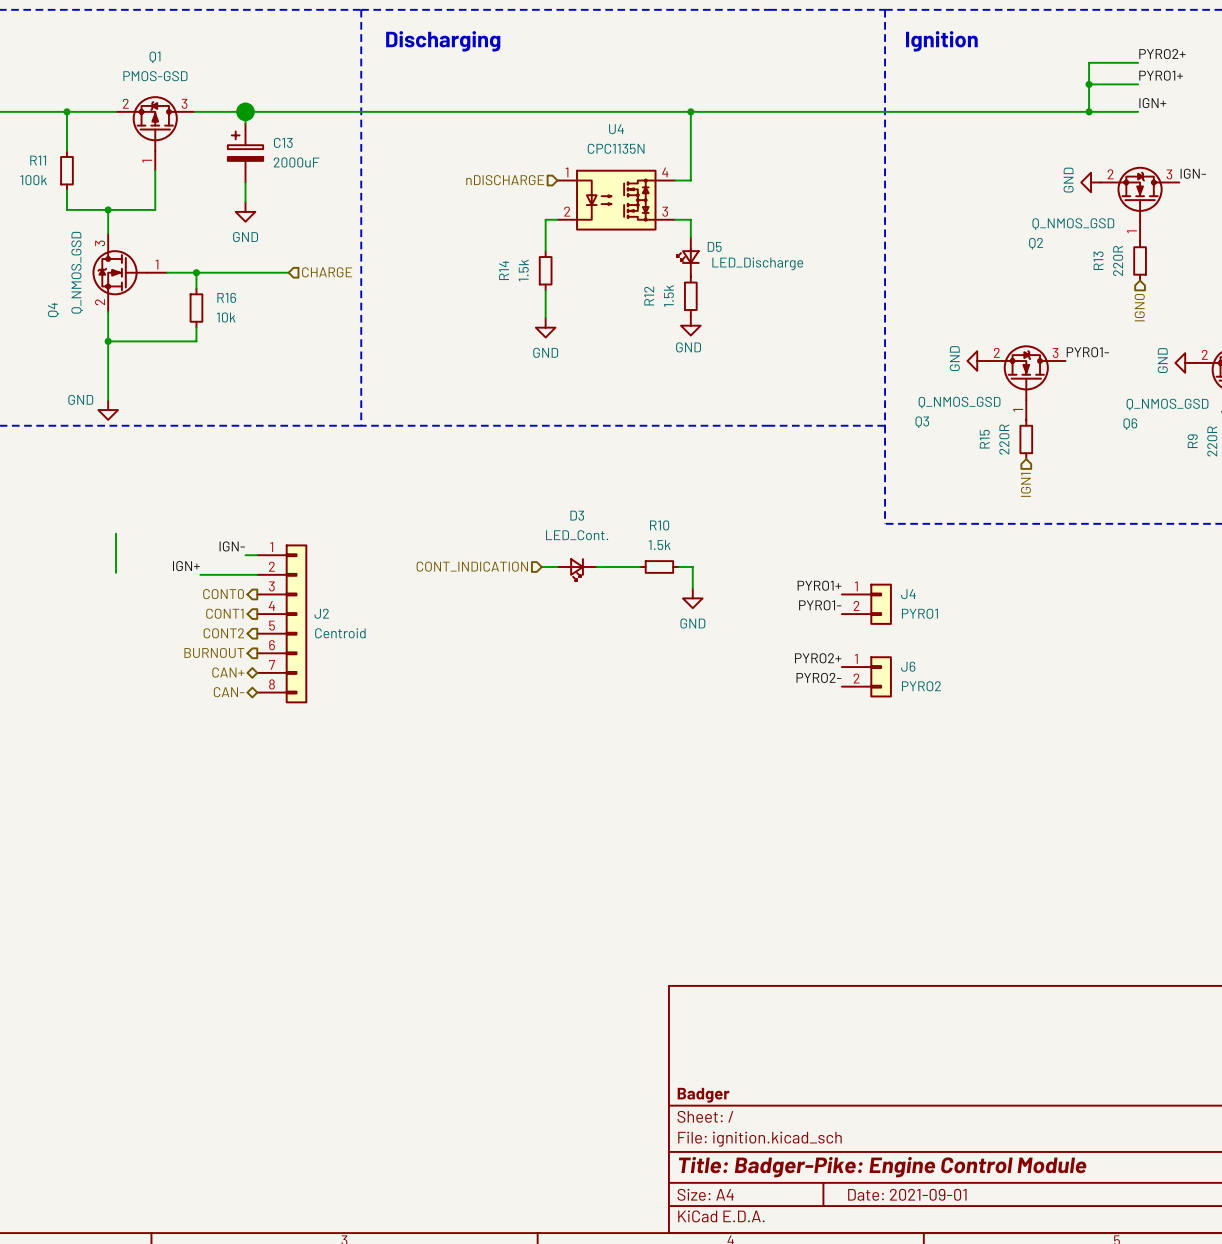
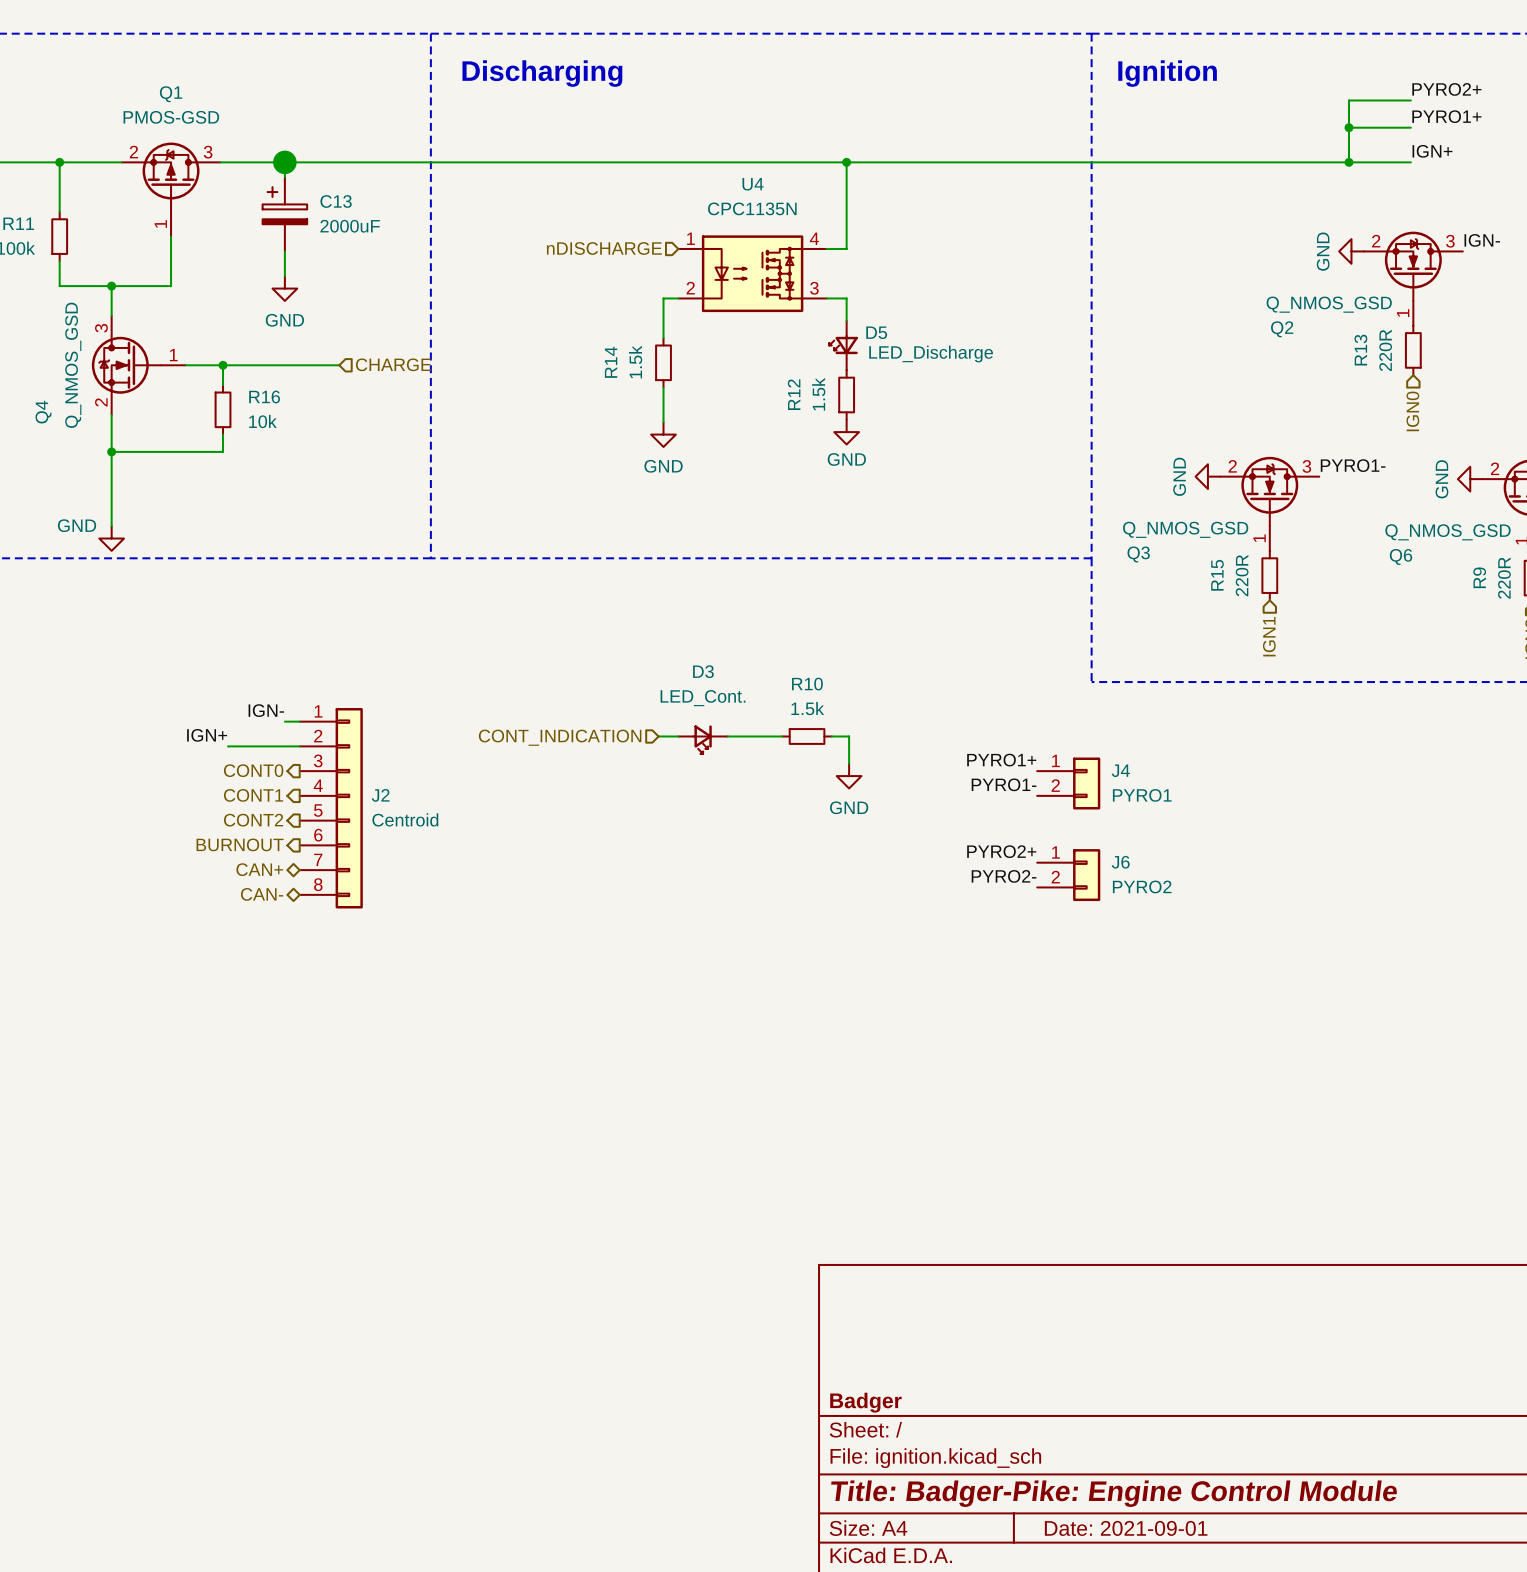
wire: (116, 533) (116, 572) -> none

